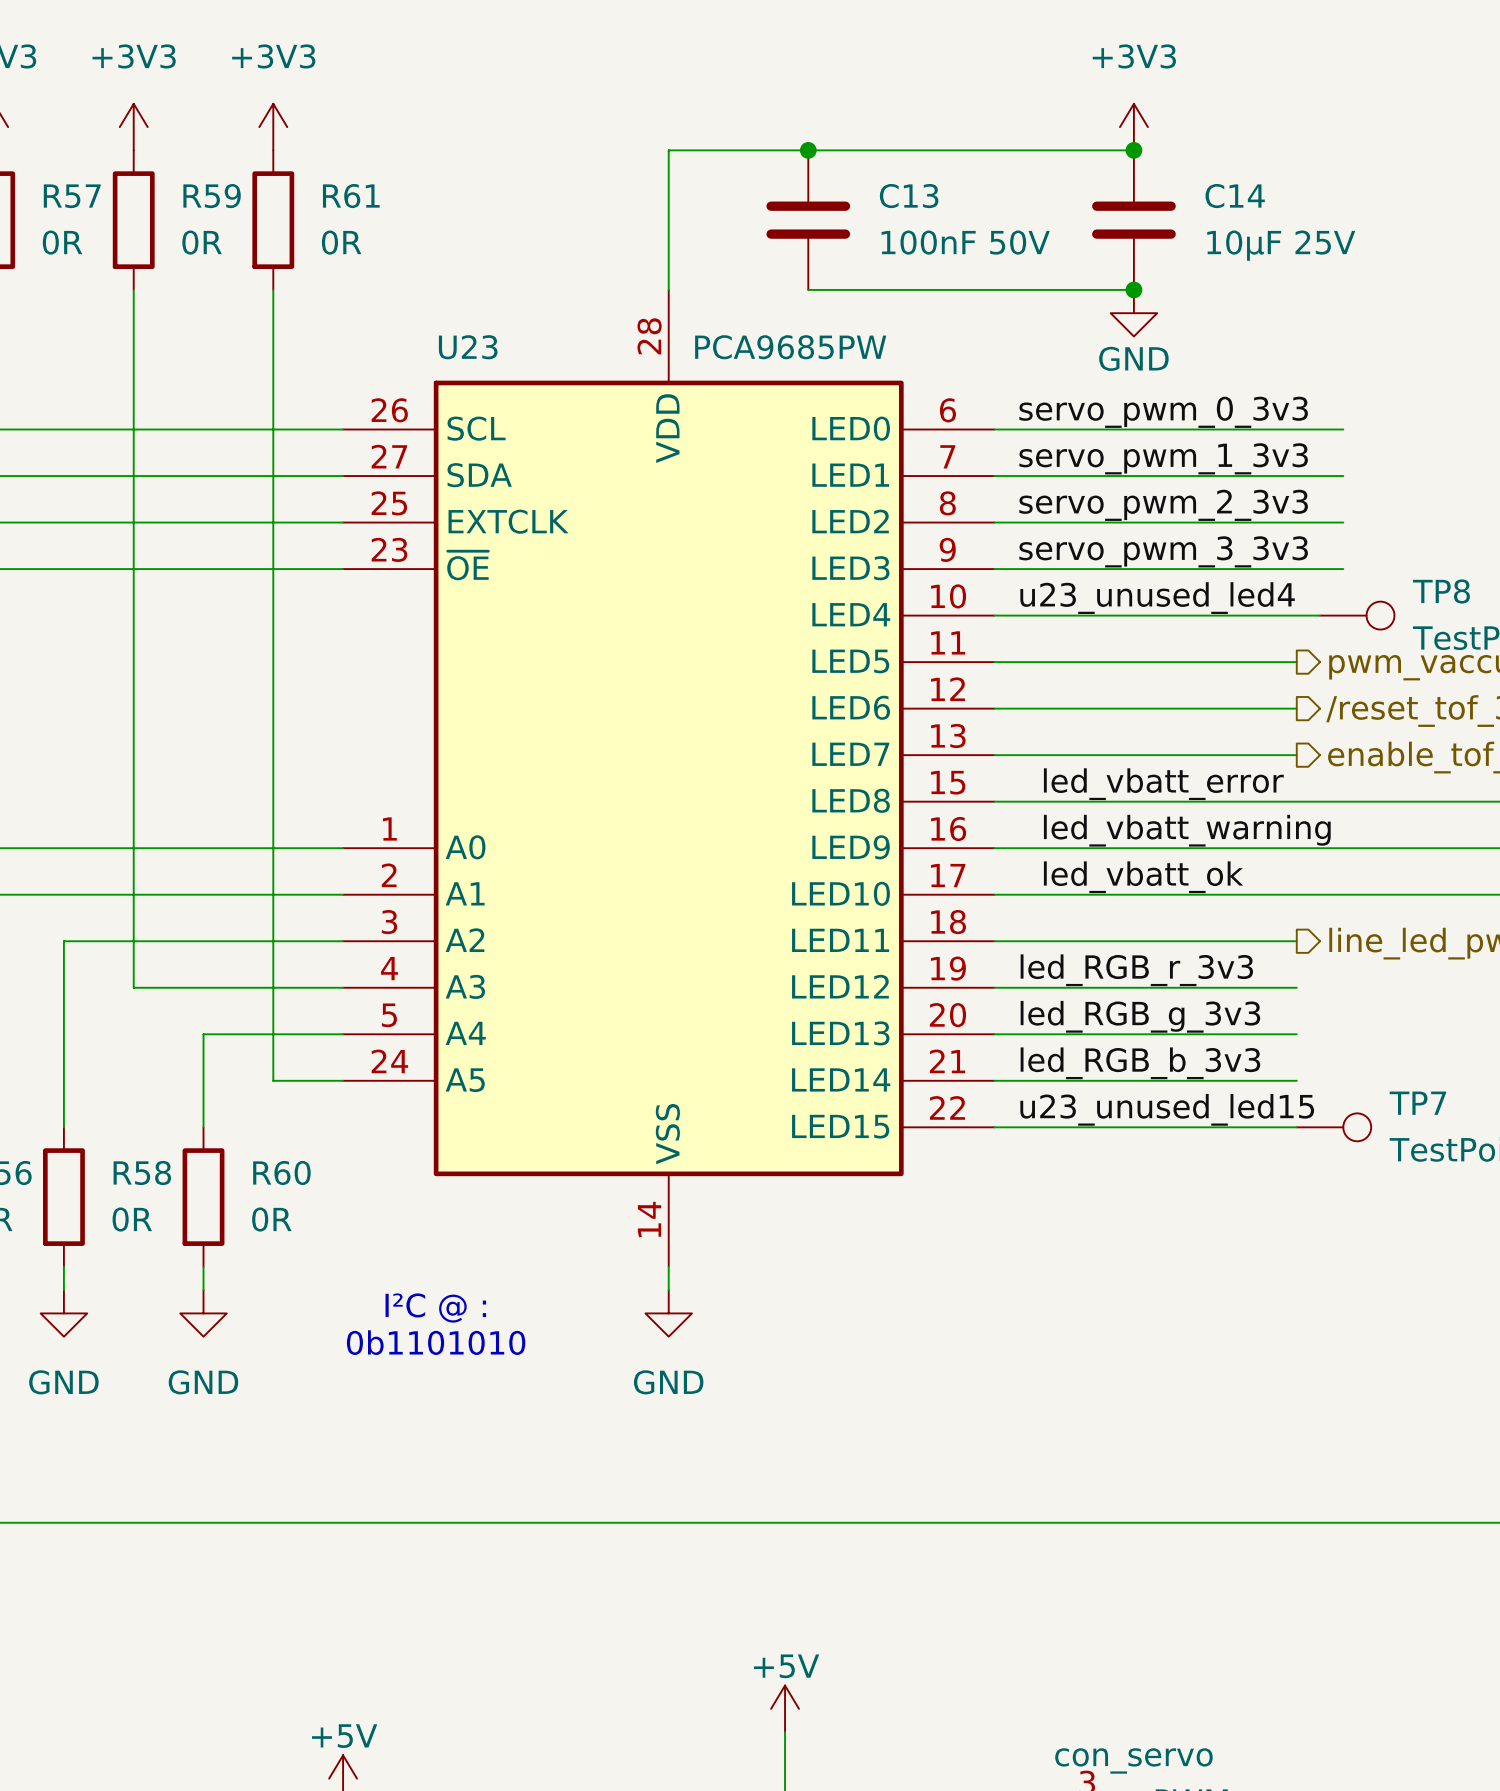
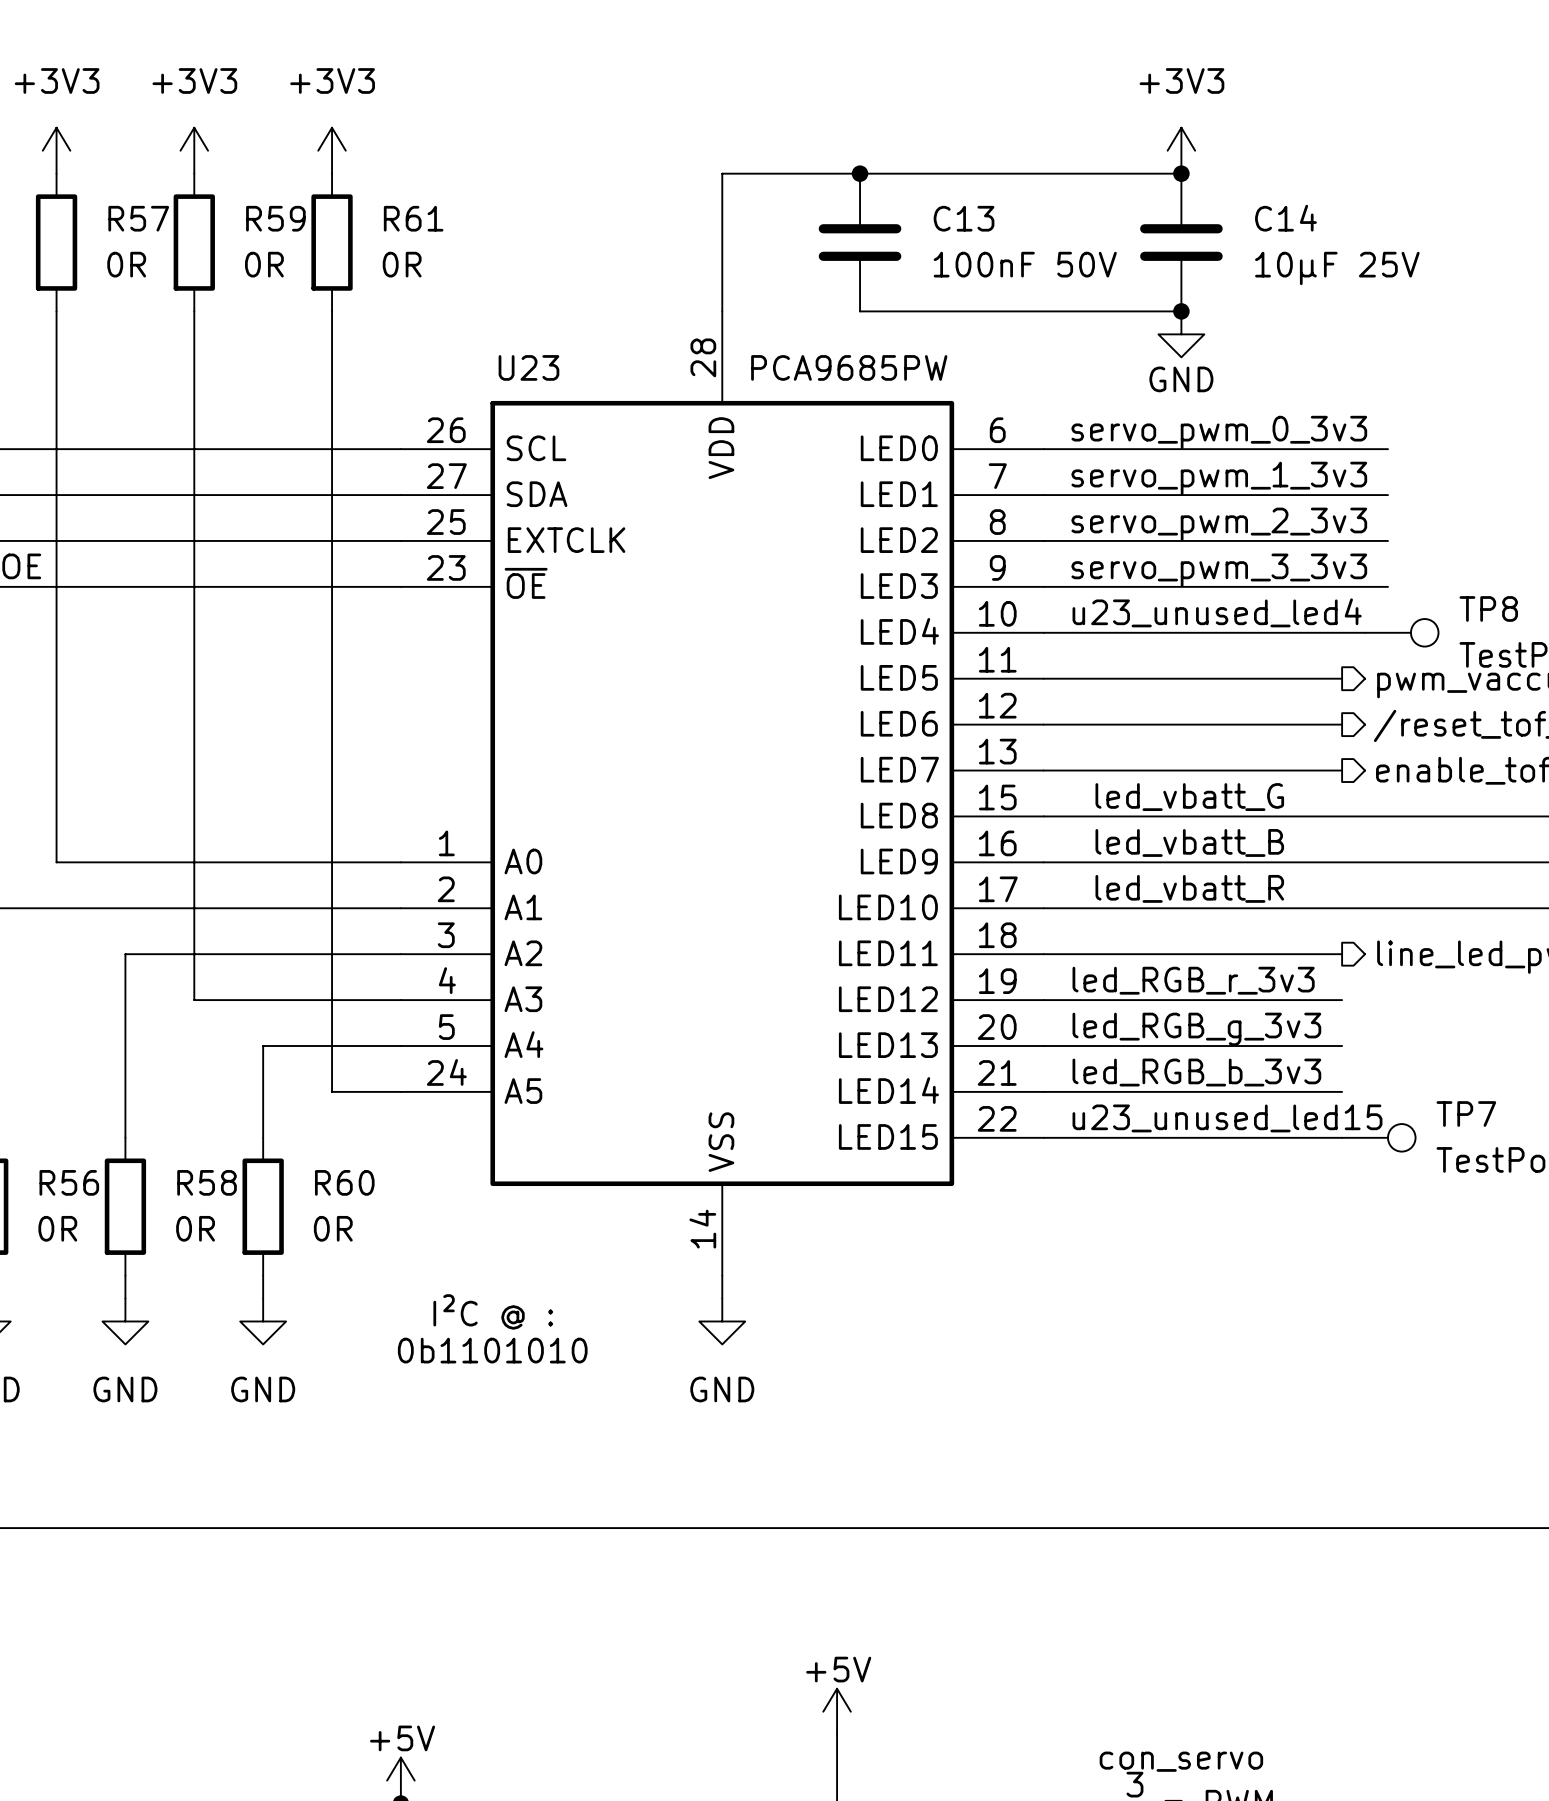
label: led_vbatt_error (1163, 784) -> led_vbatt_G (1189, 797)
label: led_vbatt_warning (1187, 830) -> led_vbatt_B (1189, 842)
label: led_vbatt_ok (1143, 877) -> led_vbatt_R (1189, 888)

